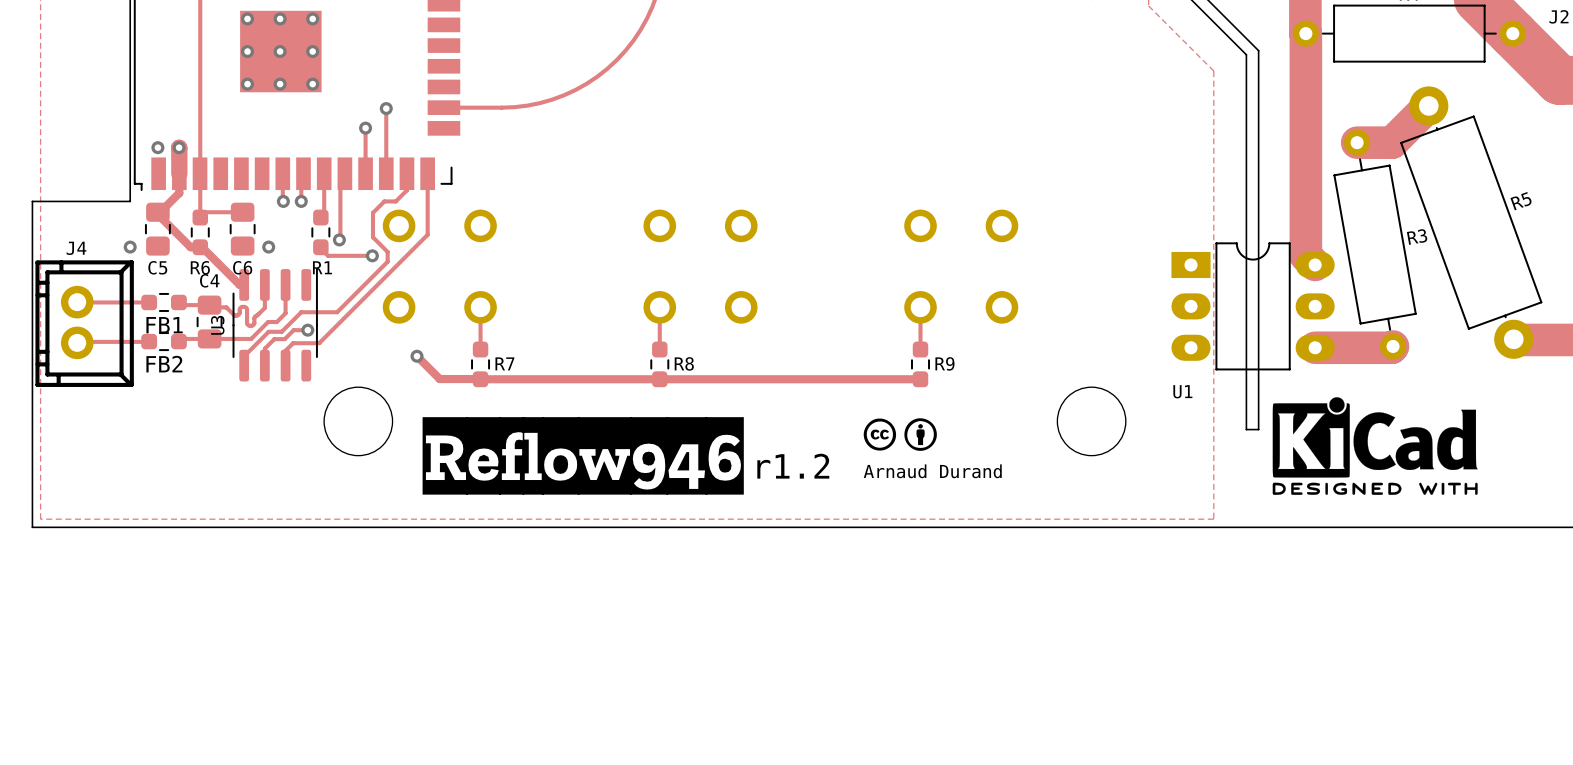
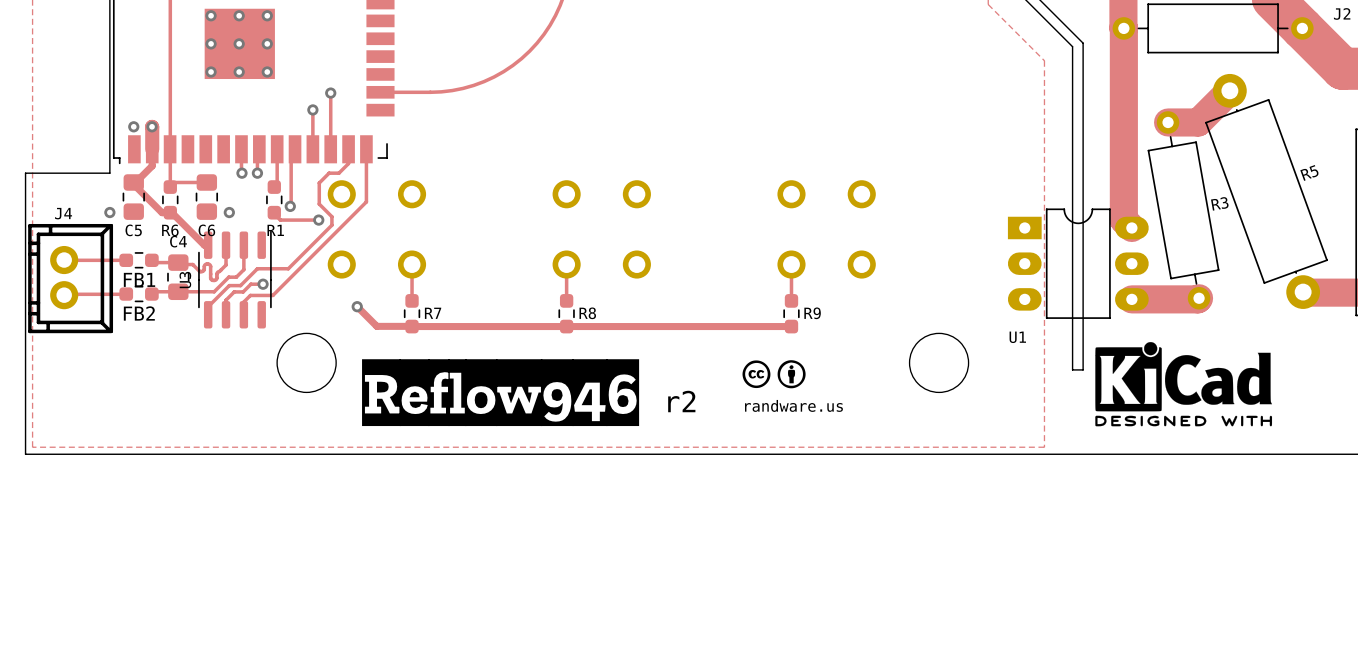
text: r1.2 (793, 466) -> r2 (681, 401)
text: Arnaud Durand (932, 471) -> randware.us (793, 405)

